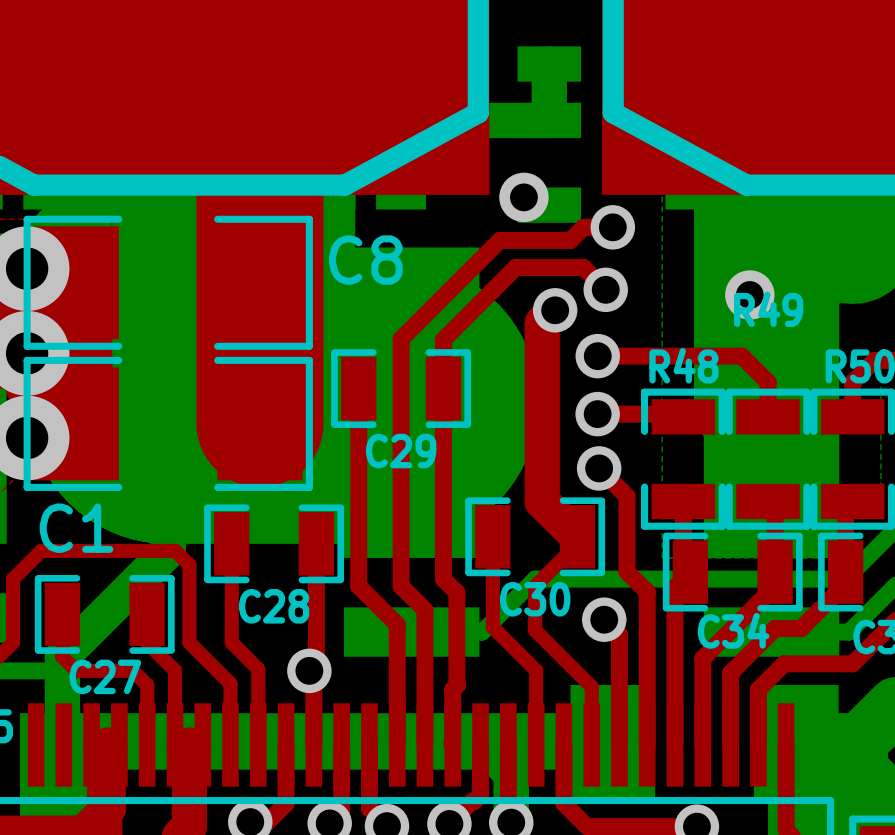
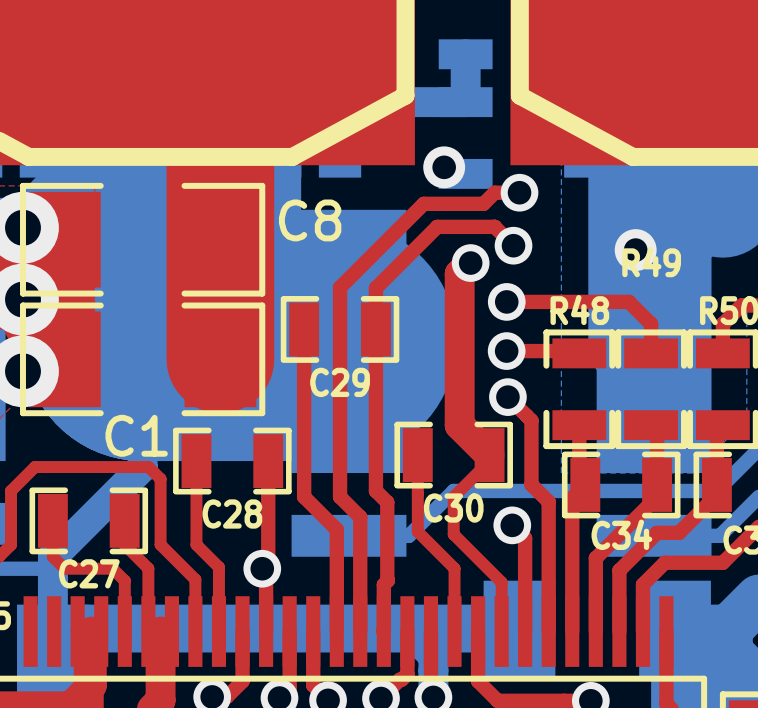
C1 name position: C1 (76, 528) -> C1 (136, 435)

